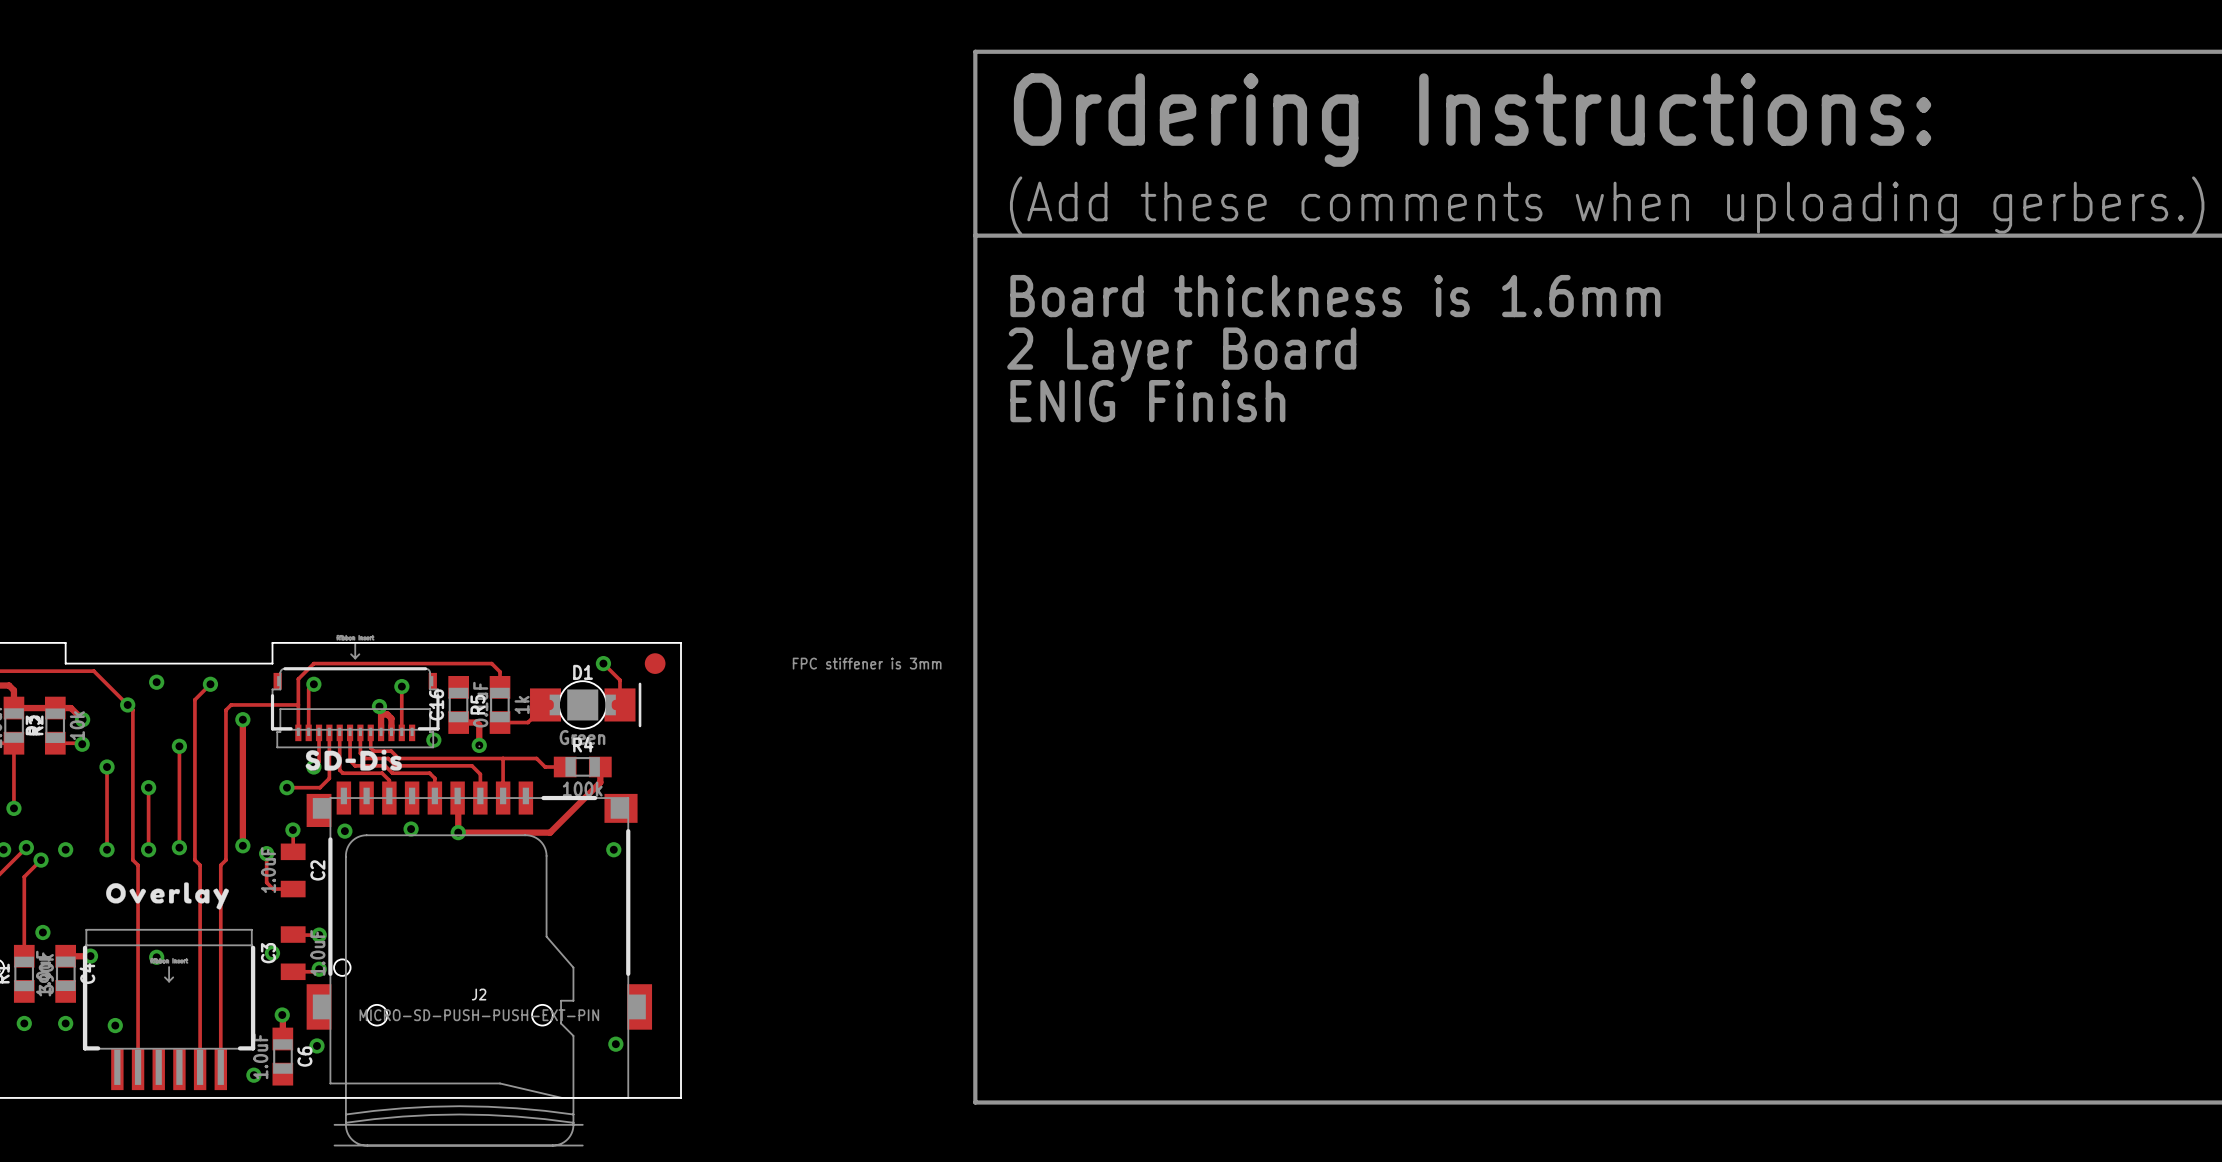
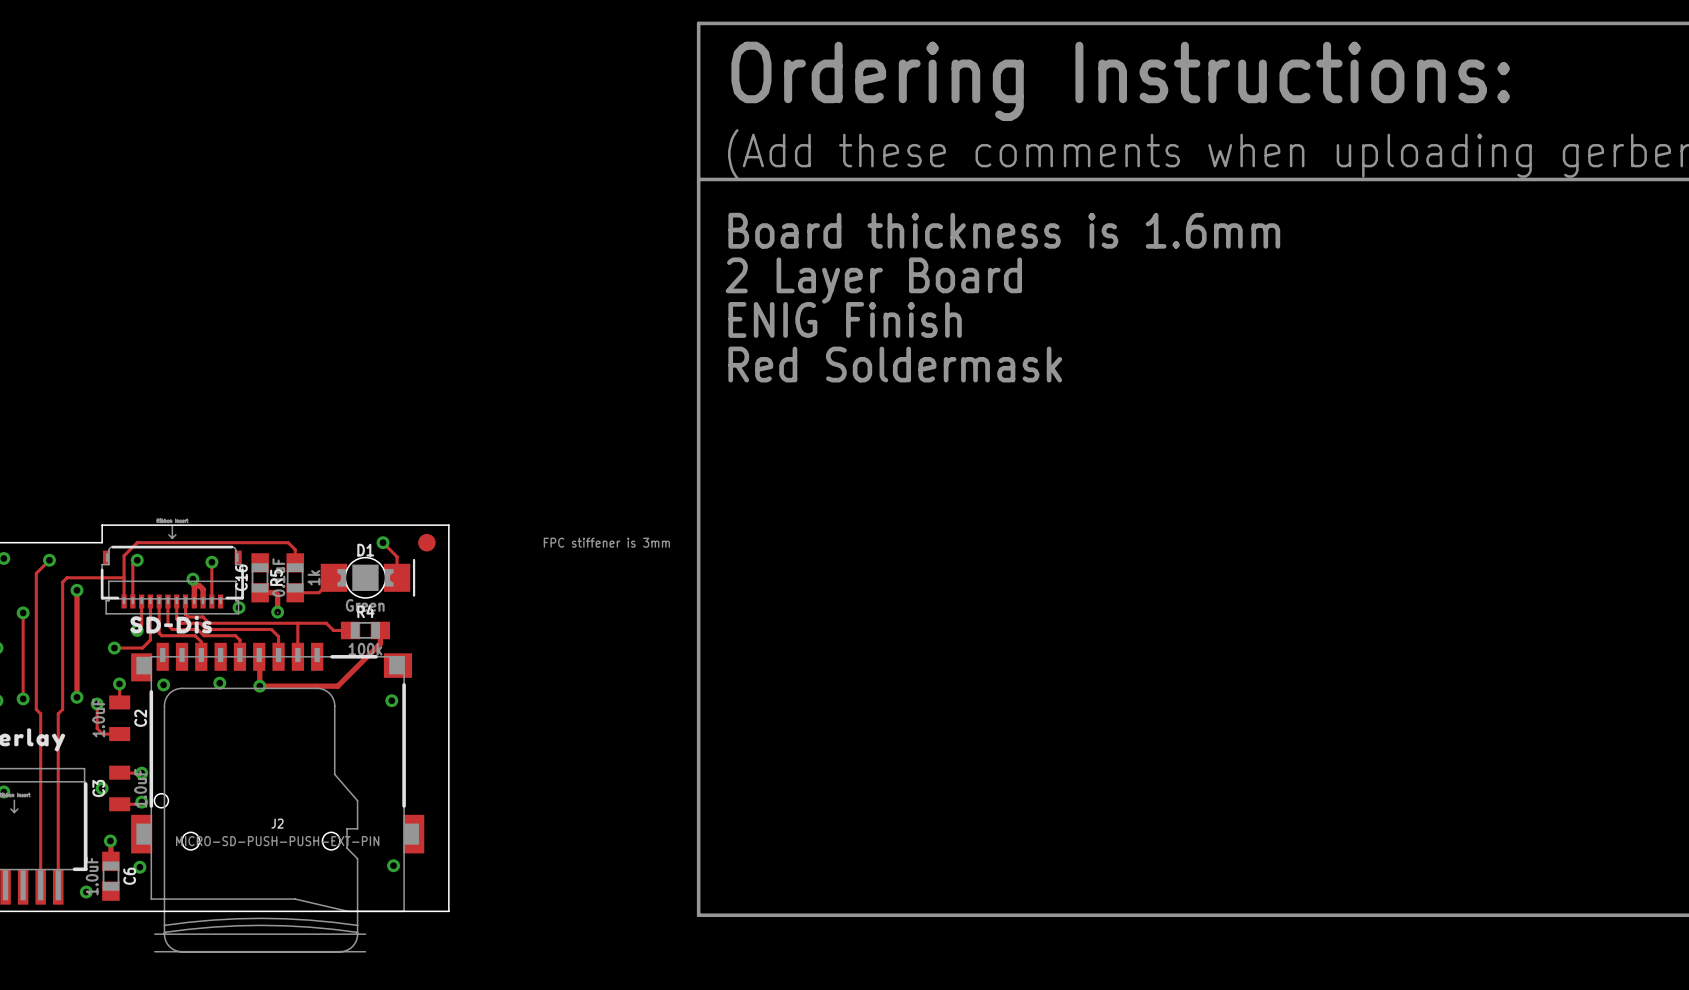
text: none -> Red Soldermask (895, 364)

